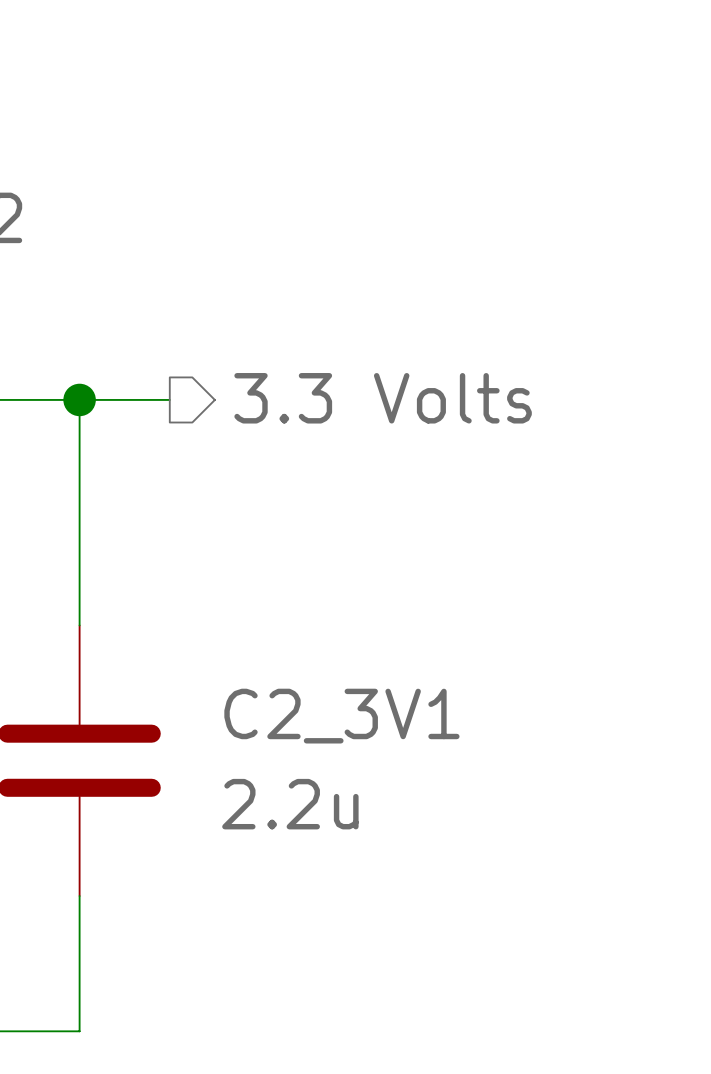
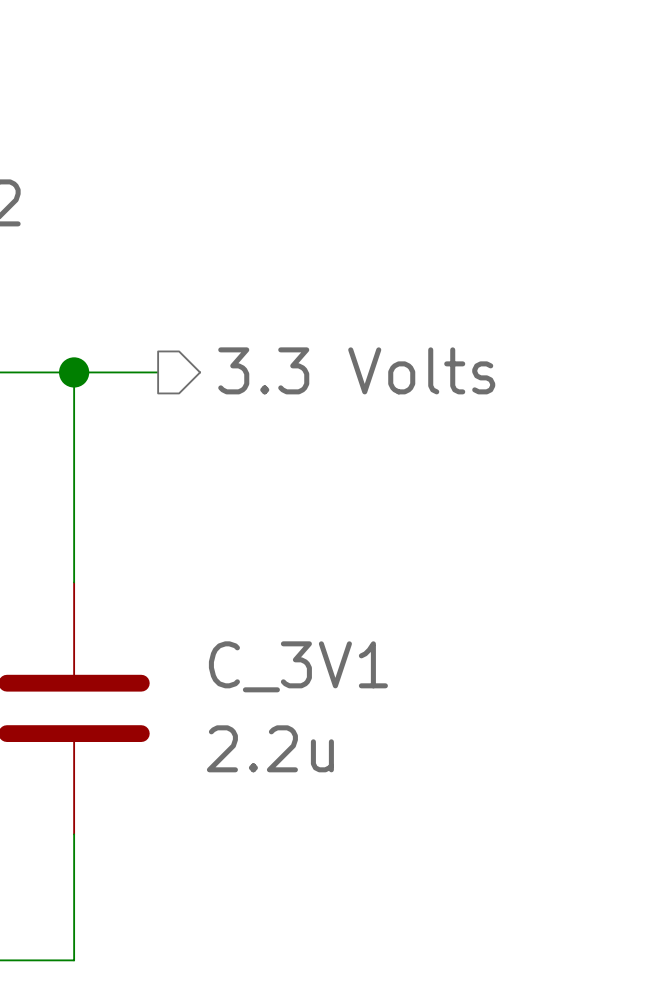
C2_3V1 name: C2_3V1 (341, 716) -> C_3V1 (298, 666)

